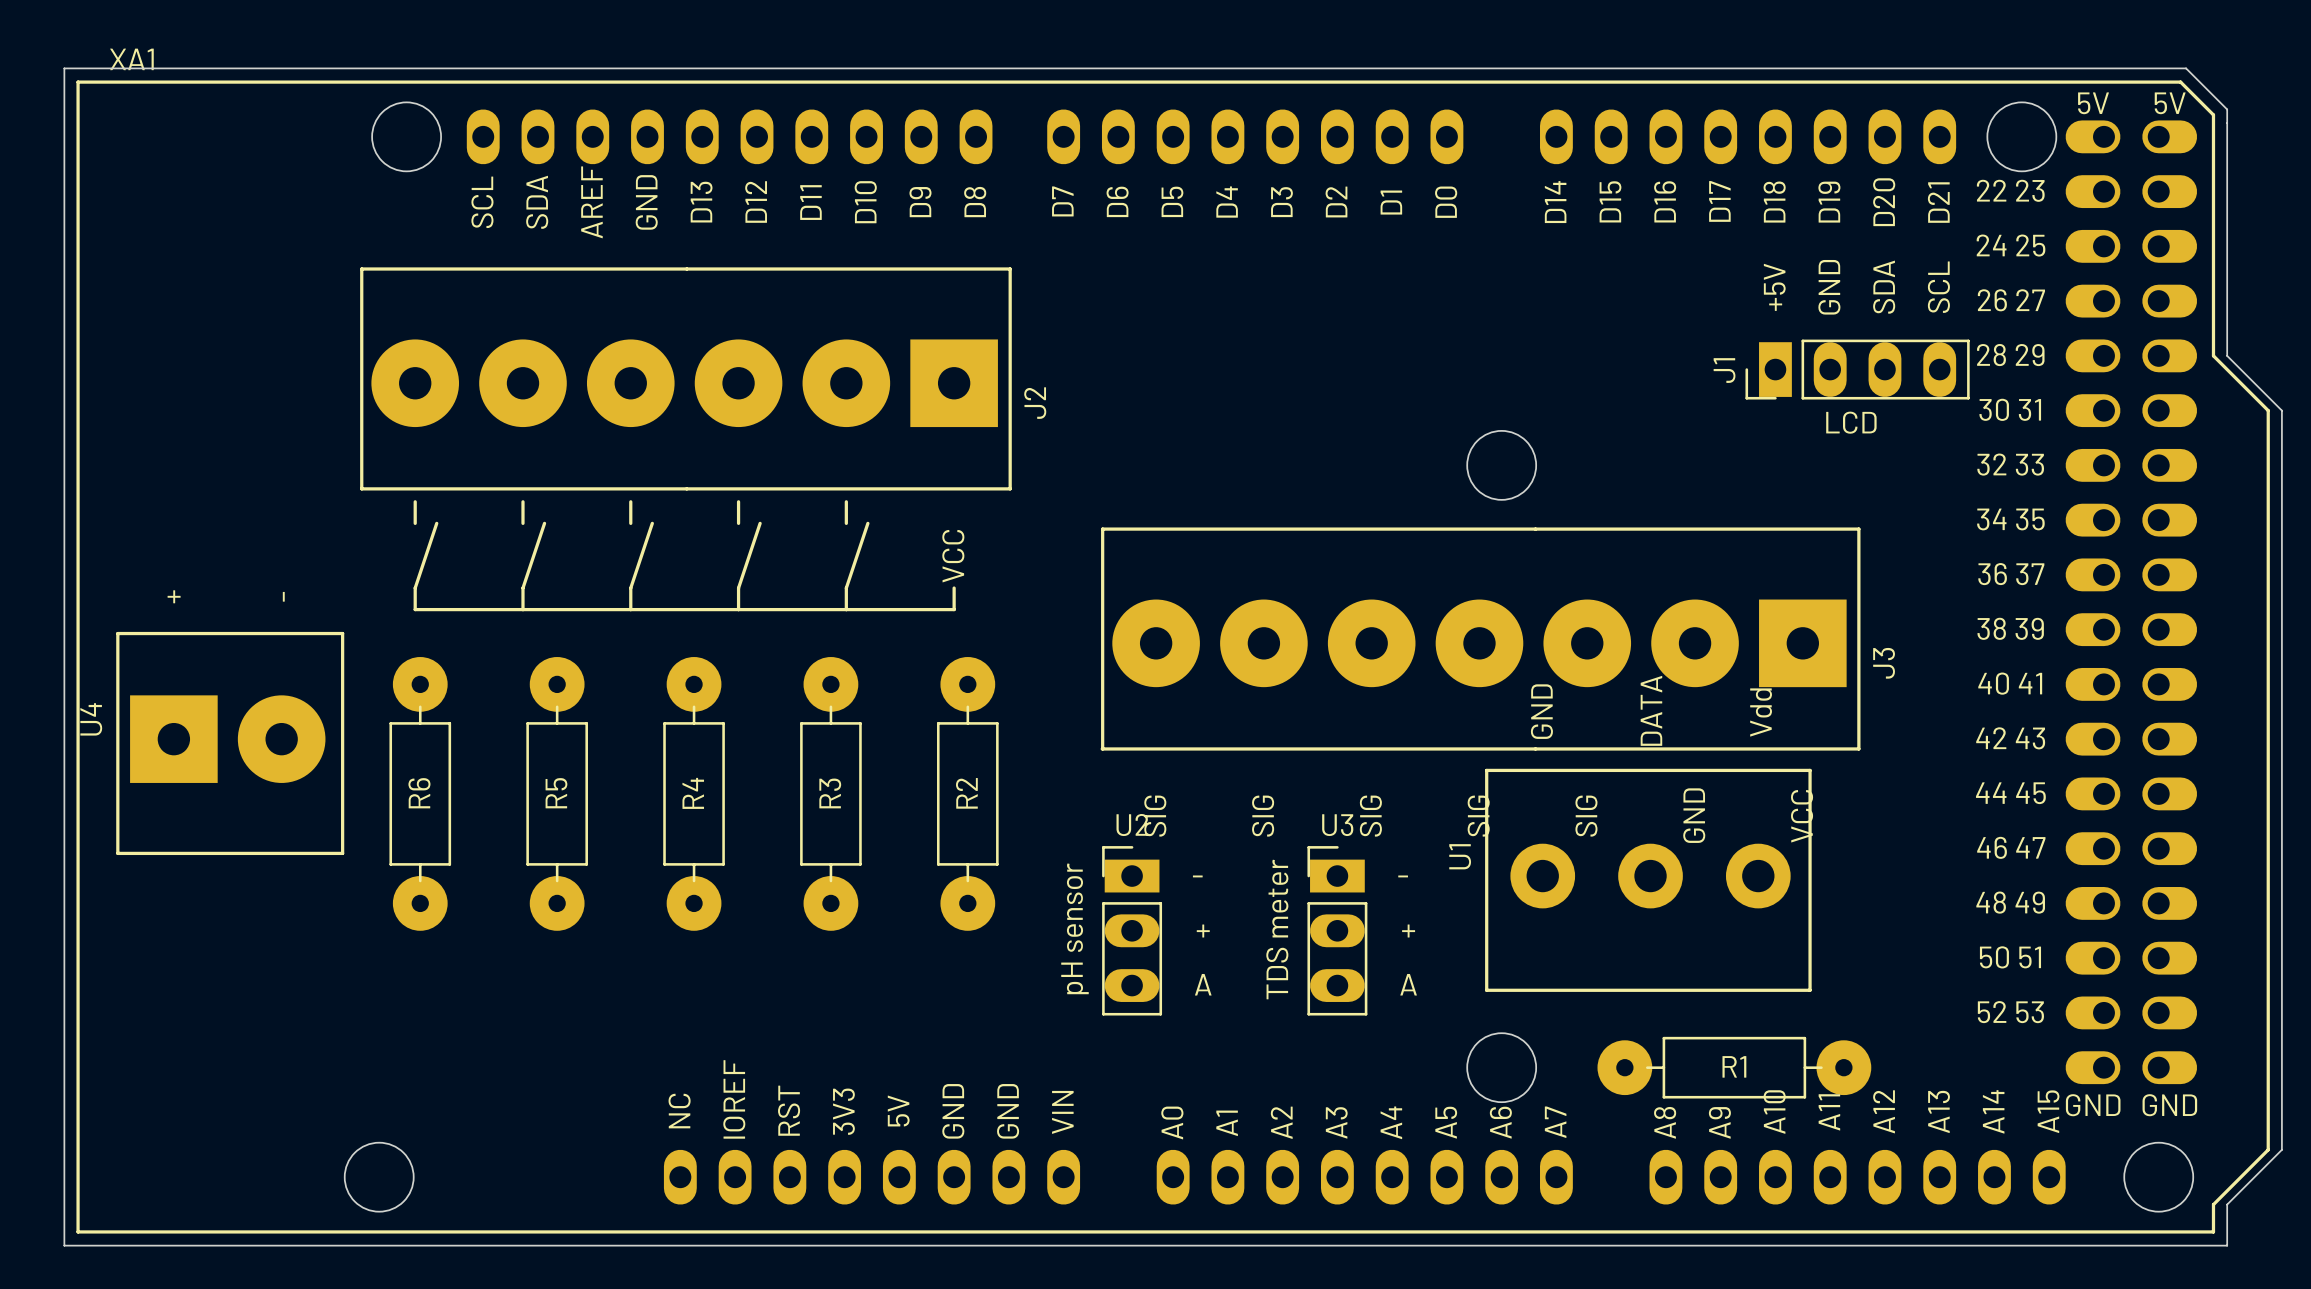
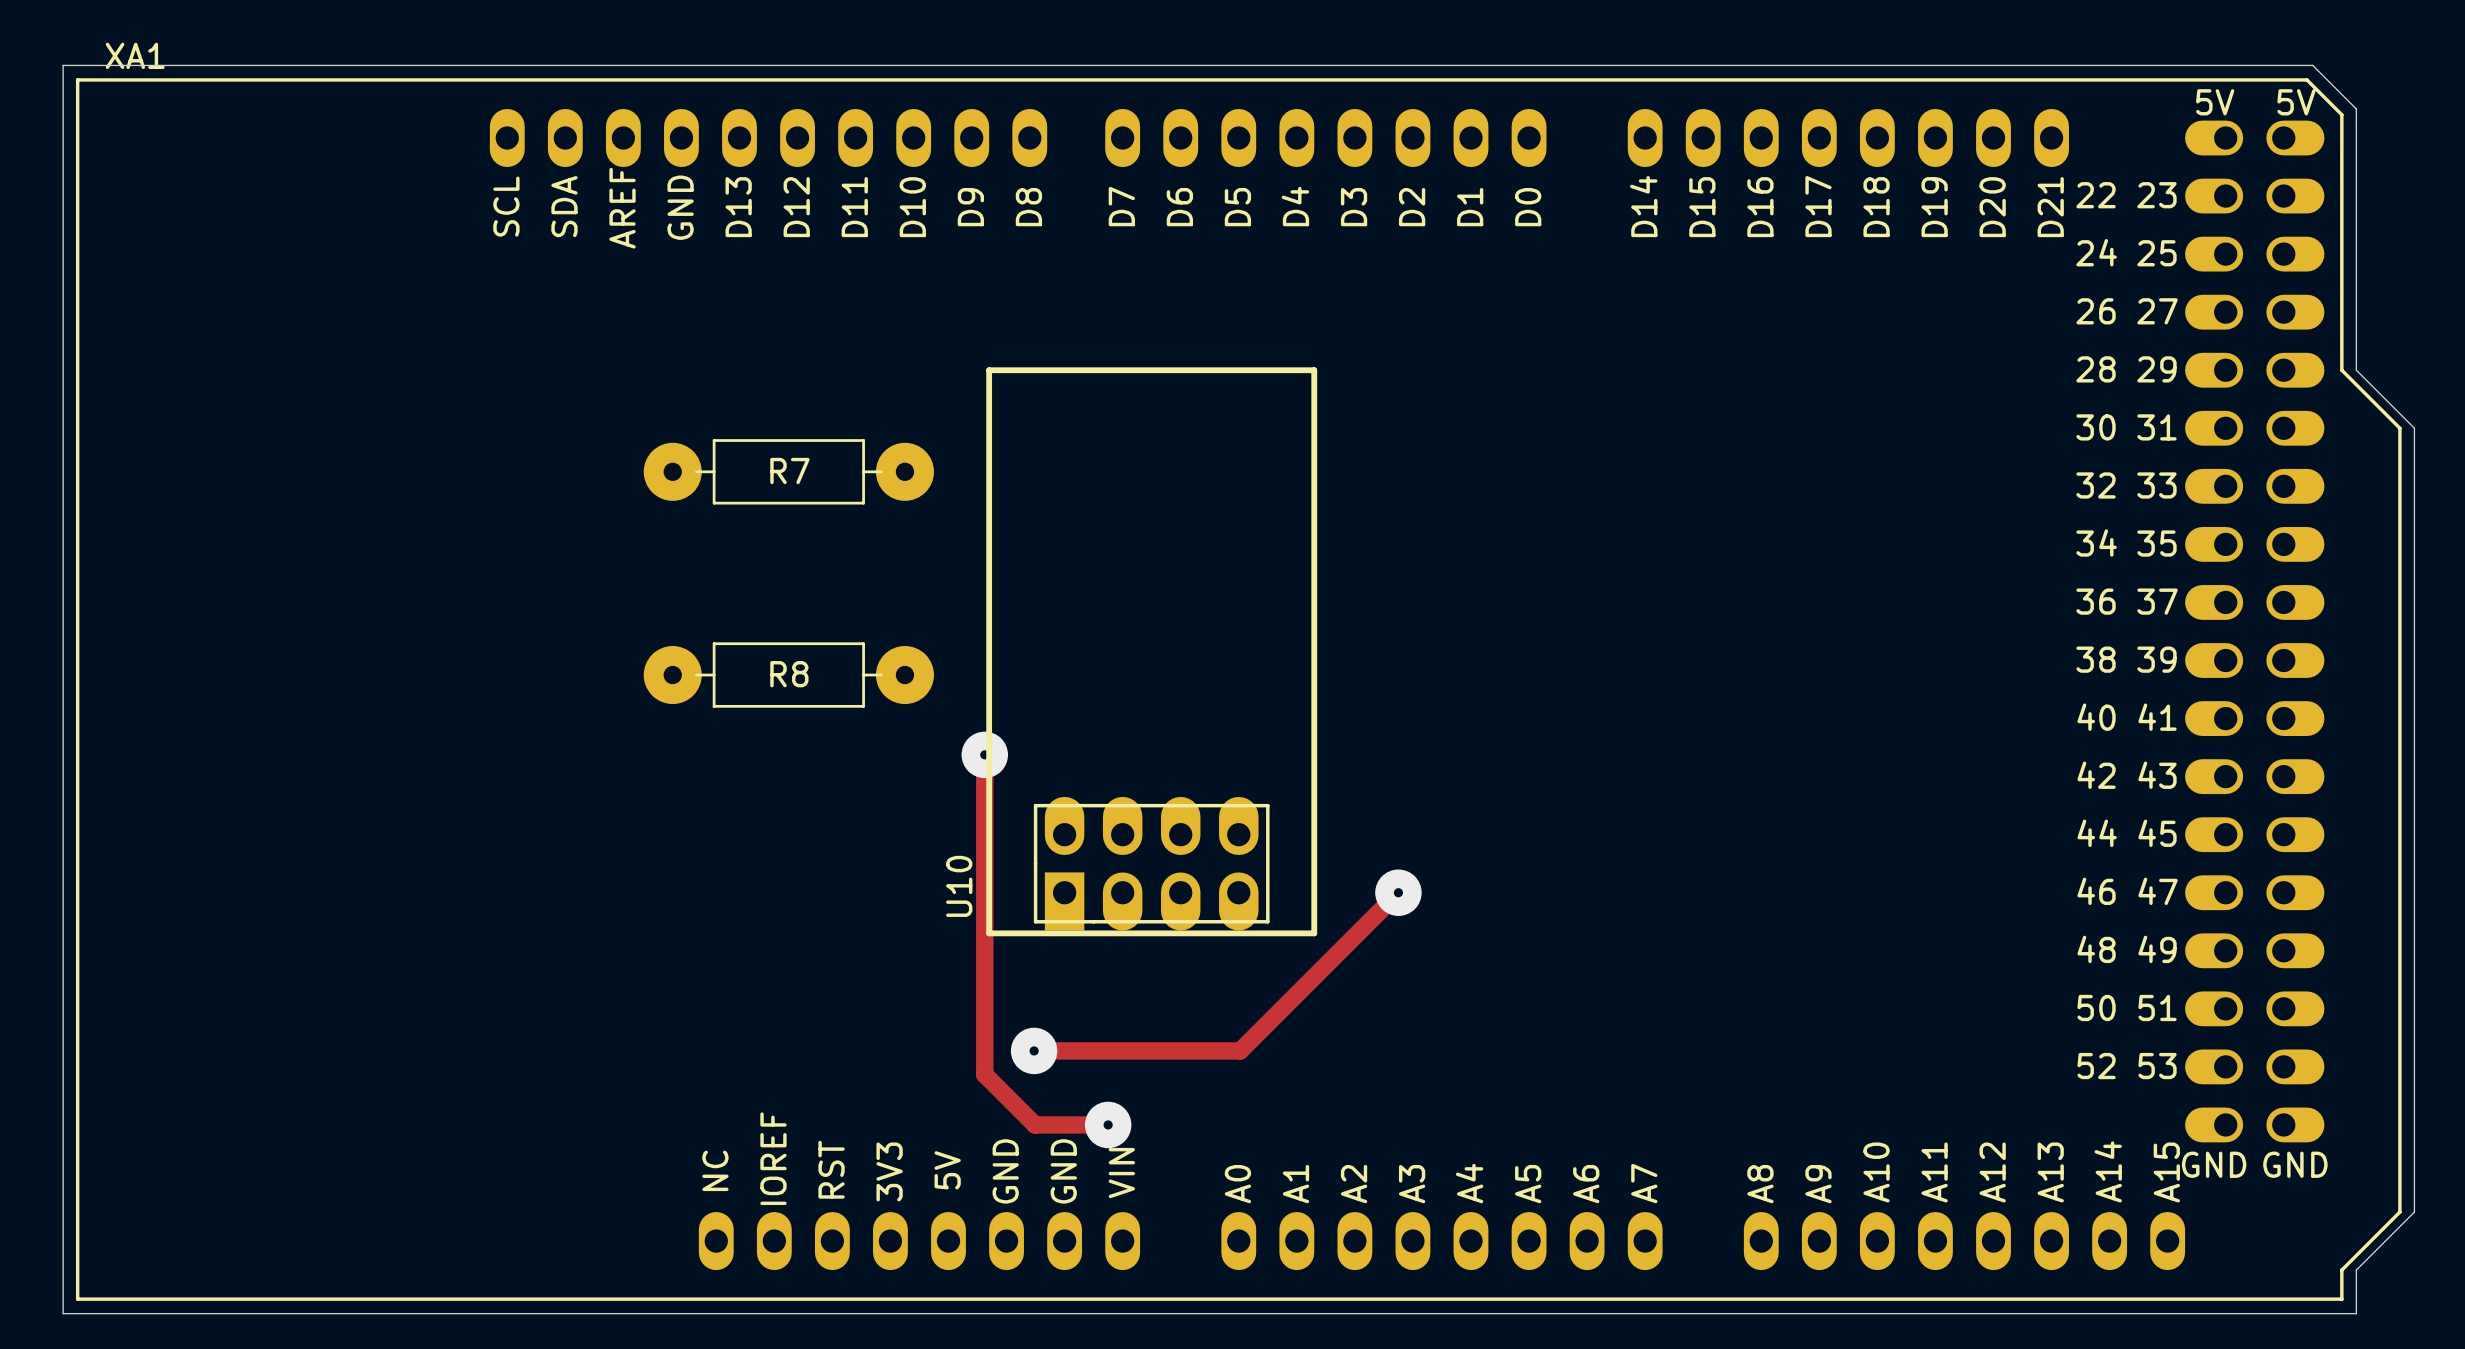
XA1 footprint: [76, 80, 2270, 1234] -> [75, 78, 2402, 1301]
J1: (1857, 369) -> none
J2: (685, 439) -> none
R7: none -> (788, 471)
U10: none -> (1151, 651)
J3: (1480, 639) -> none
R8: none -> (788, 675)
track: none -> (984, 754) (984, 1074) (1035, 1124) (1108, 1124)
via: none -> (984, 754)
U4: (230, 743) -> none
R6: (420, 793) -> none
R5: (557, 793) -> none
R4: (694, 793) -> none
R3: (830, 793) -> none
R2: (967, 793) -> none
track: none -> (1398, 892) (1240, 1050) (1034, 1050)
via: none -> (1398, 892)
U1: (1648, 880) -> none
U2: (1132, 930) -> none
U3: (1337, 930) -> none
via: none -> (1034, 1050)
via: none -> (1108, 1124)
R1: (1734, 1067) -> none

